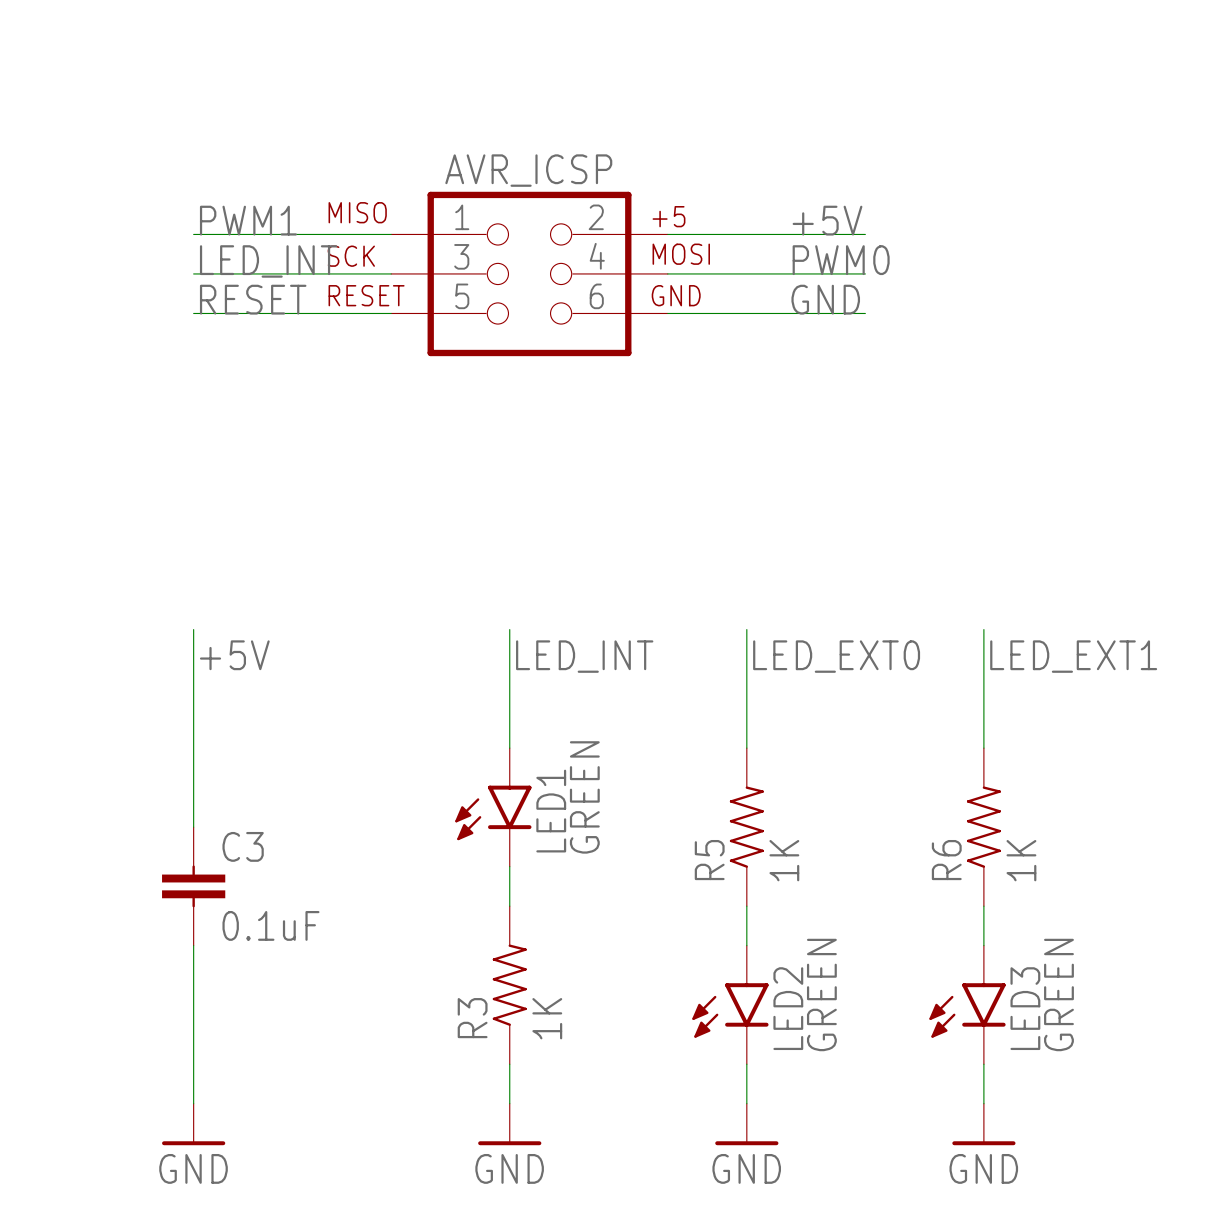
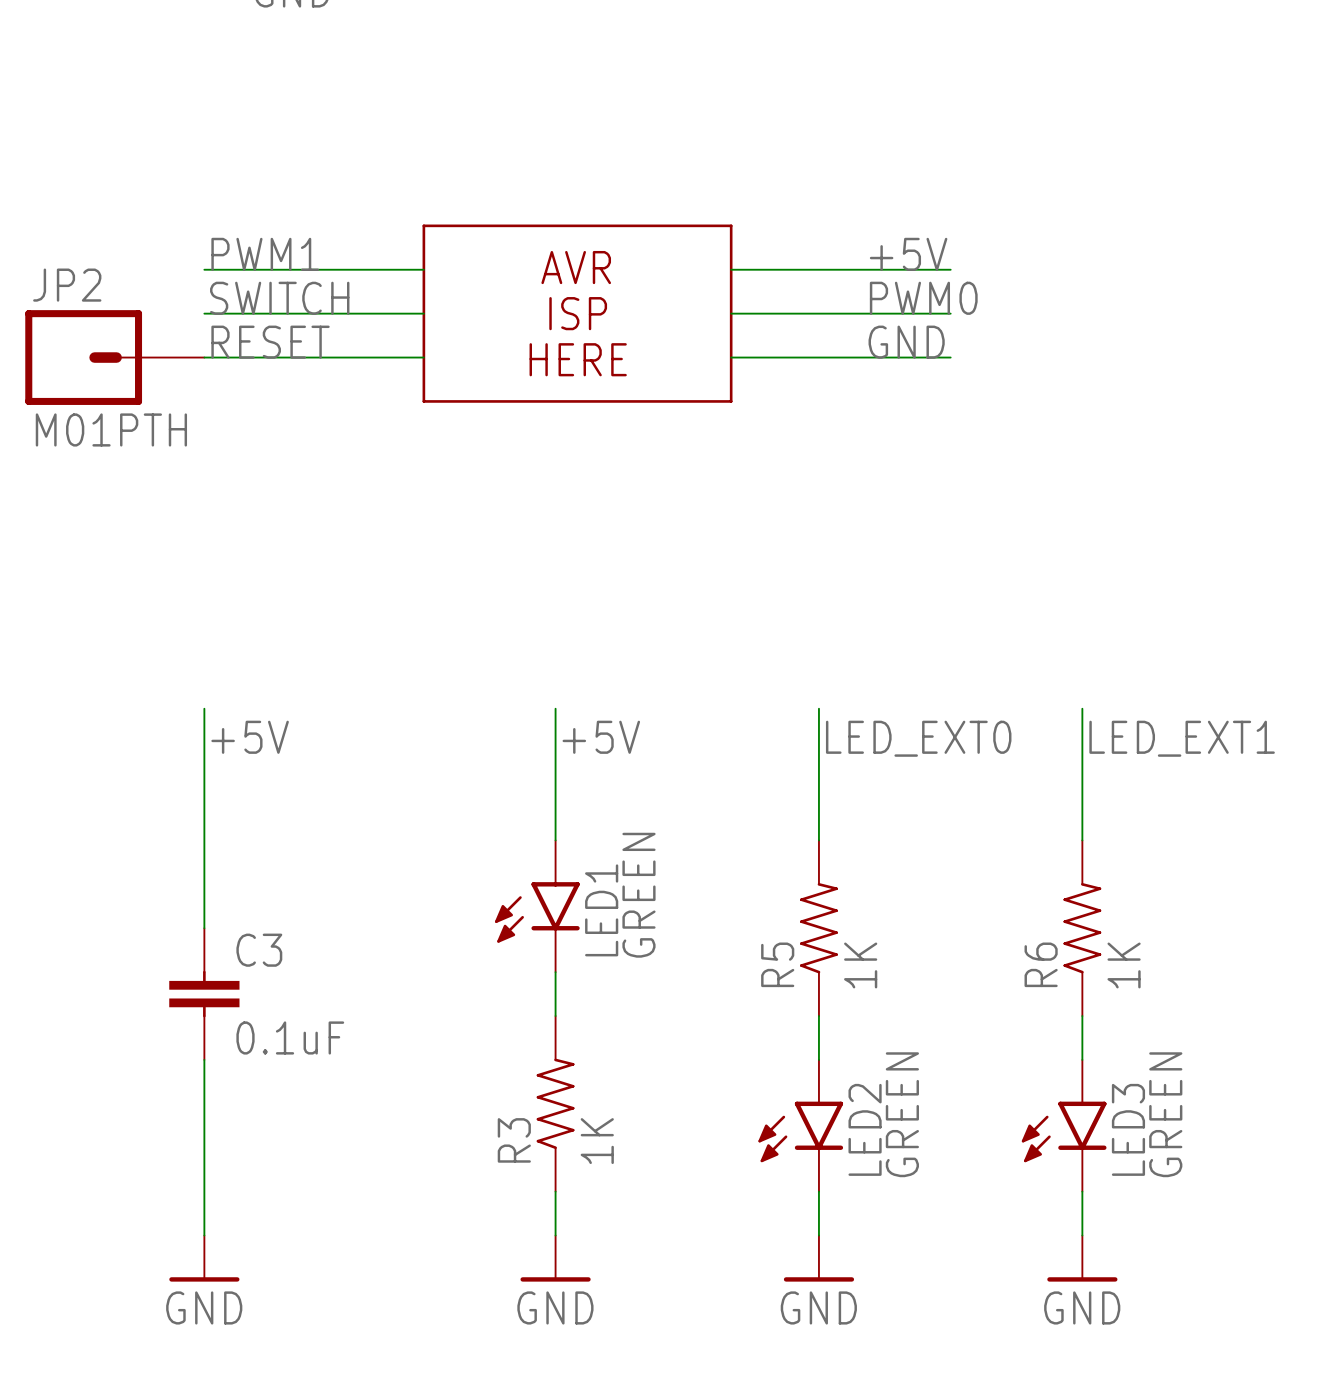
line: none -> (423, 225) (731, 225) (731, 401) (423, 401) (423, 225)
text: none -> AVR (576, 267)
label: LED_INT (268, 261) -> SWITCH (279, 298)
AVR_ICSP: (529, 273) -> none
text: none -> ISP (578, 313)
JP2: none -> M01PTH (114, 357)
text: none -> HERE (578, 359)
label: LED_INT (584, 656) -> +5V (601, 737)

